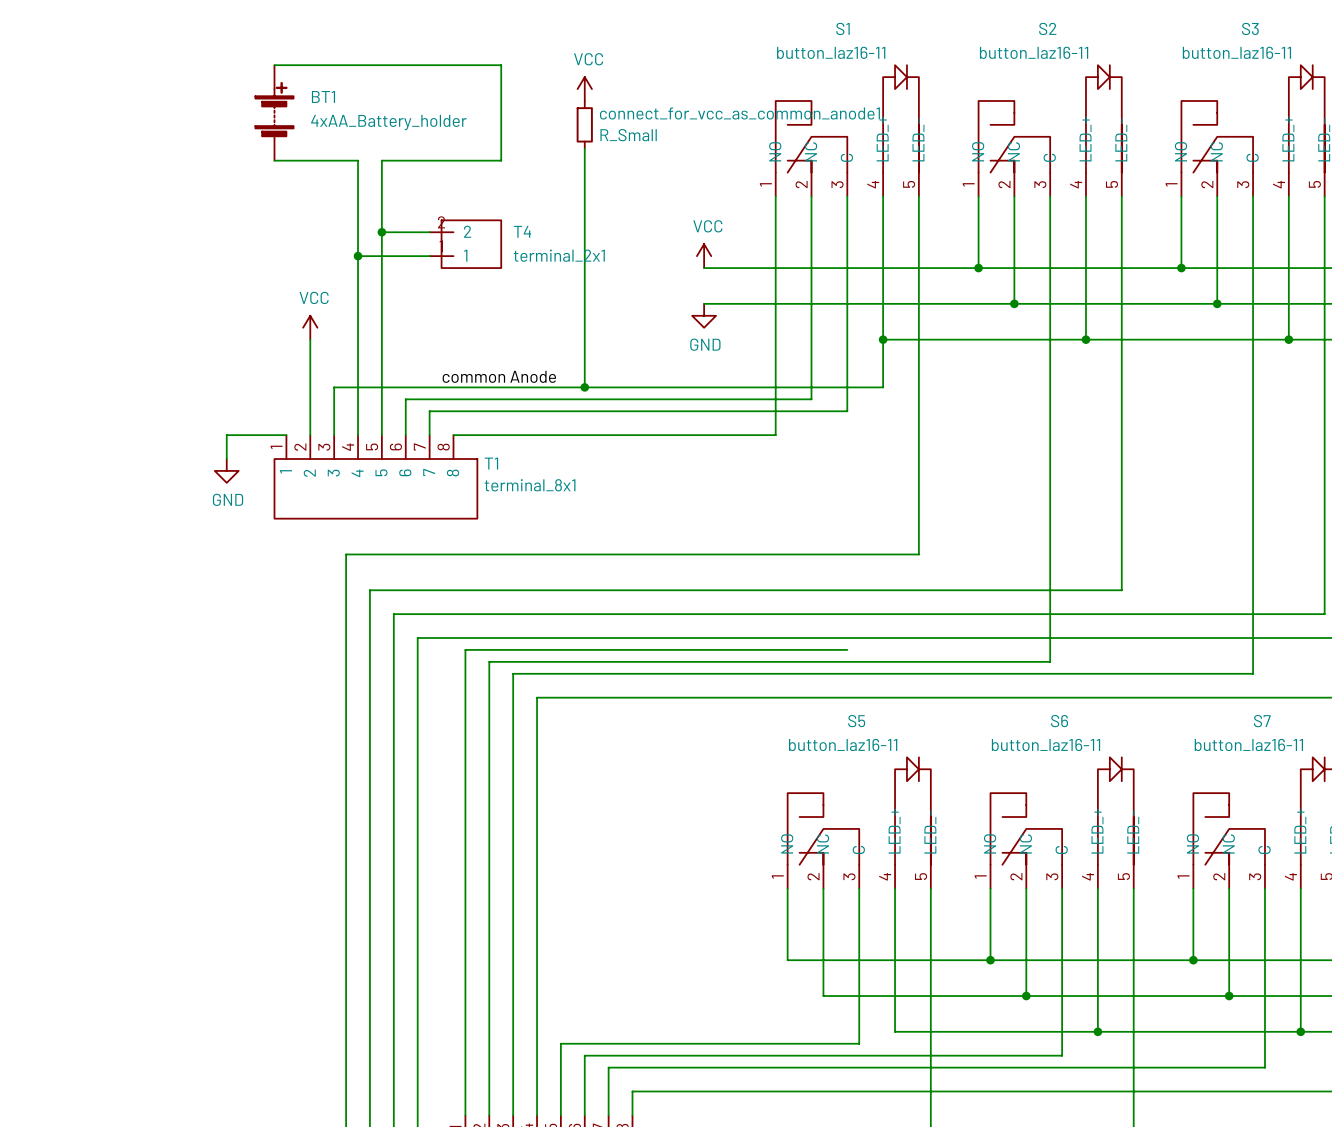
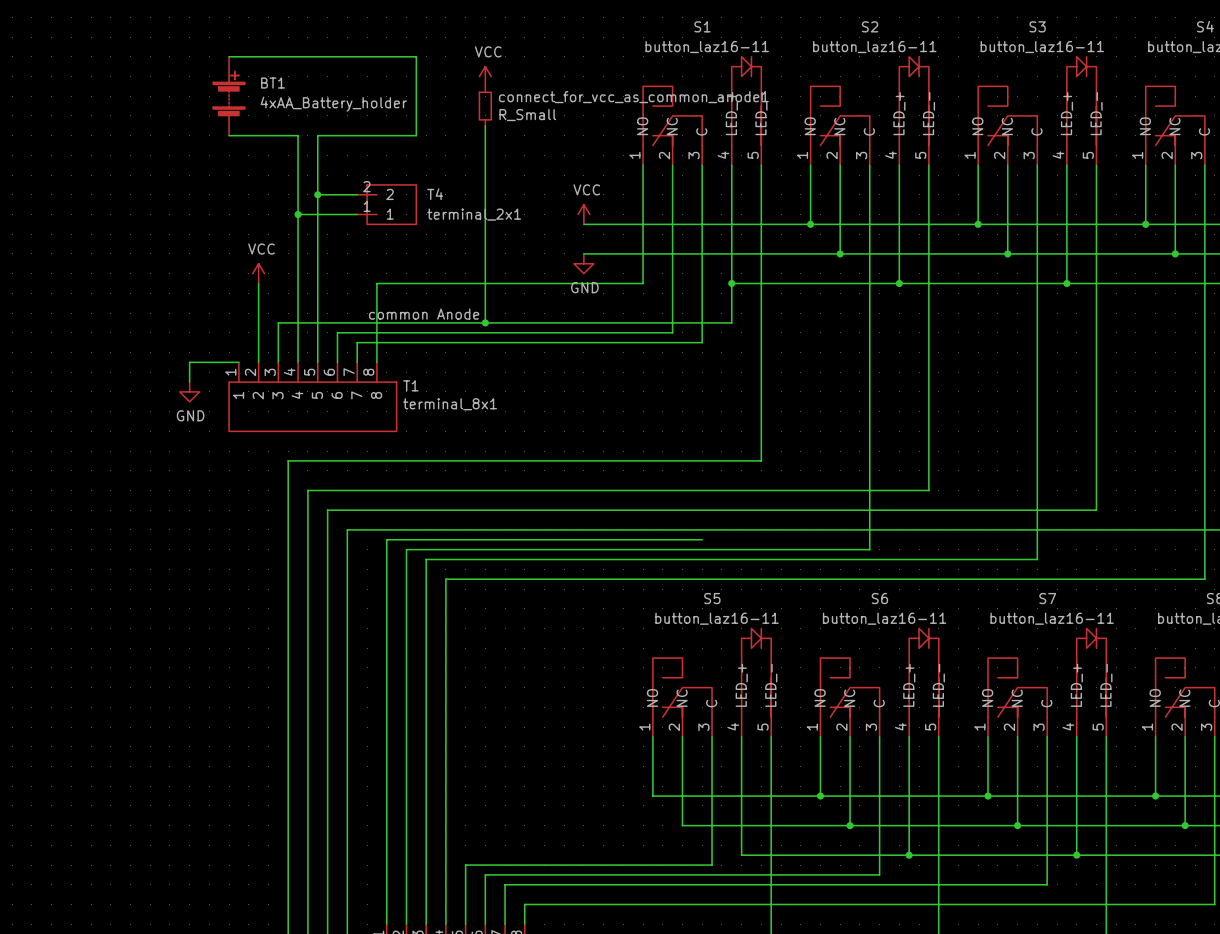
wire: (775, 339) (775, 435) (453, 435) -> (643, 283) (376, 283) (376, 362)

